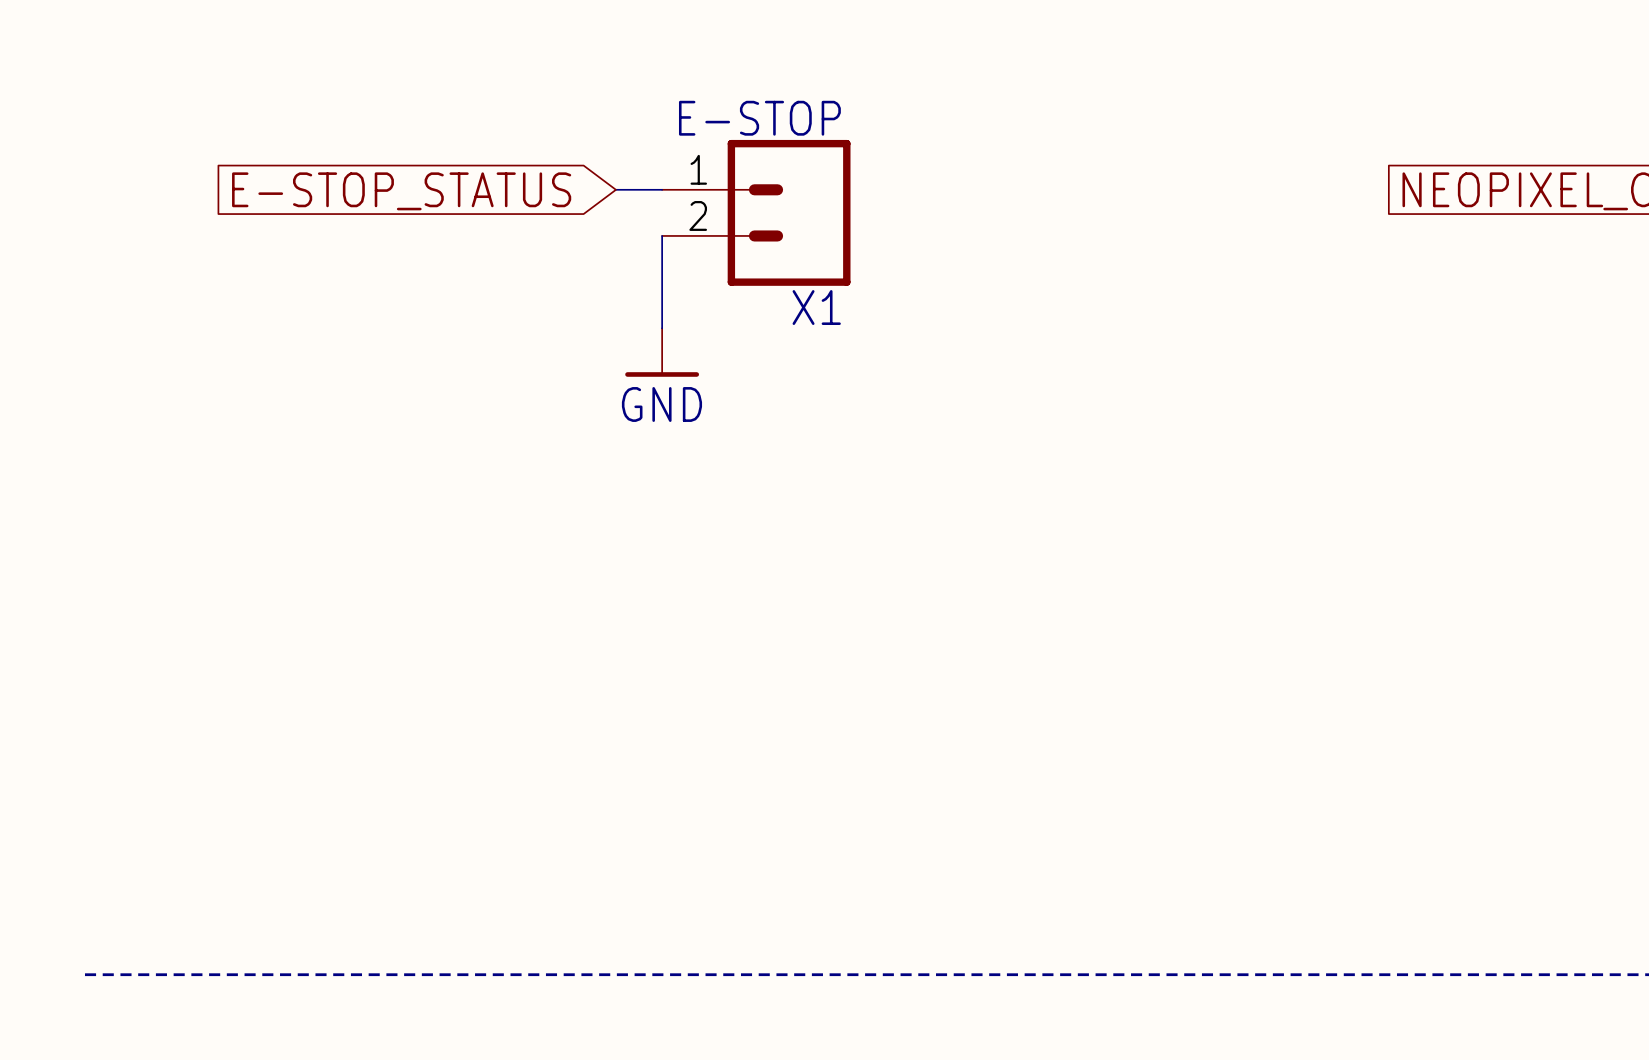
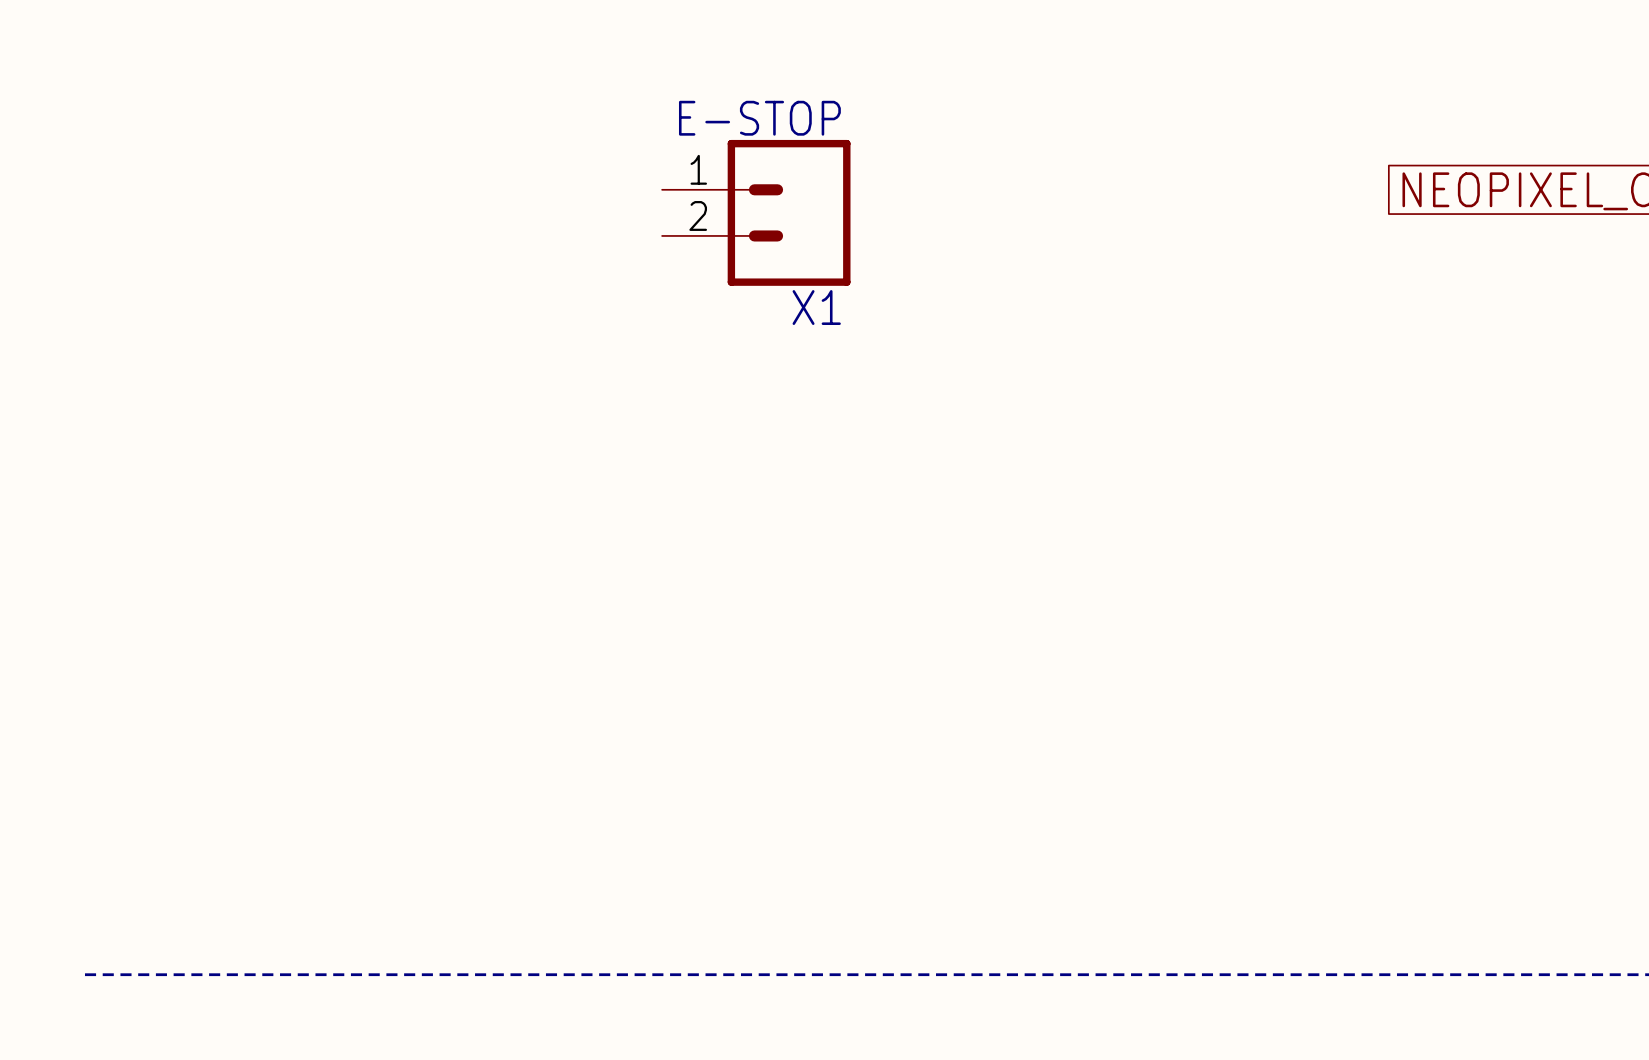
wire: (615, 189) (662, 189) -> none
global label: E-STOP_STATUS (401, 191) -> none
wire: (662, 235) (662, 328) -> none
power symbol: GND (662, 352) -> none

